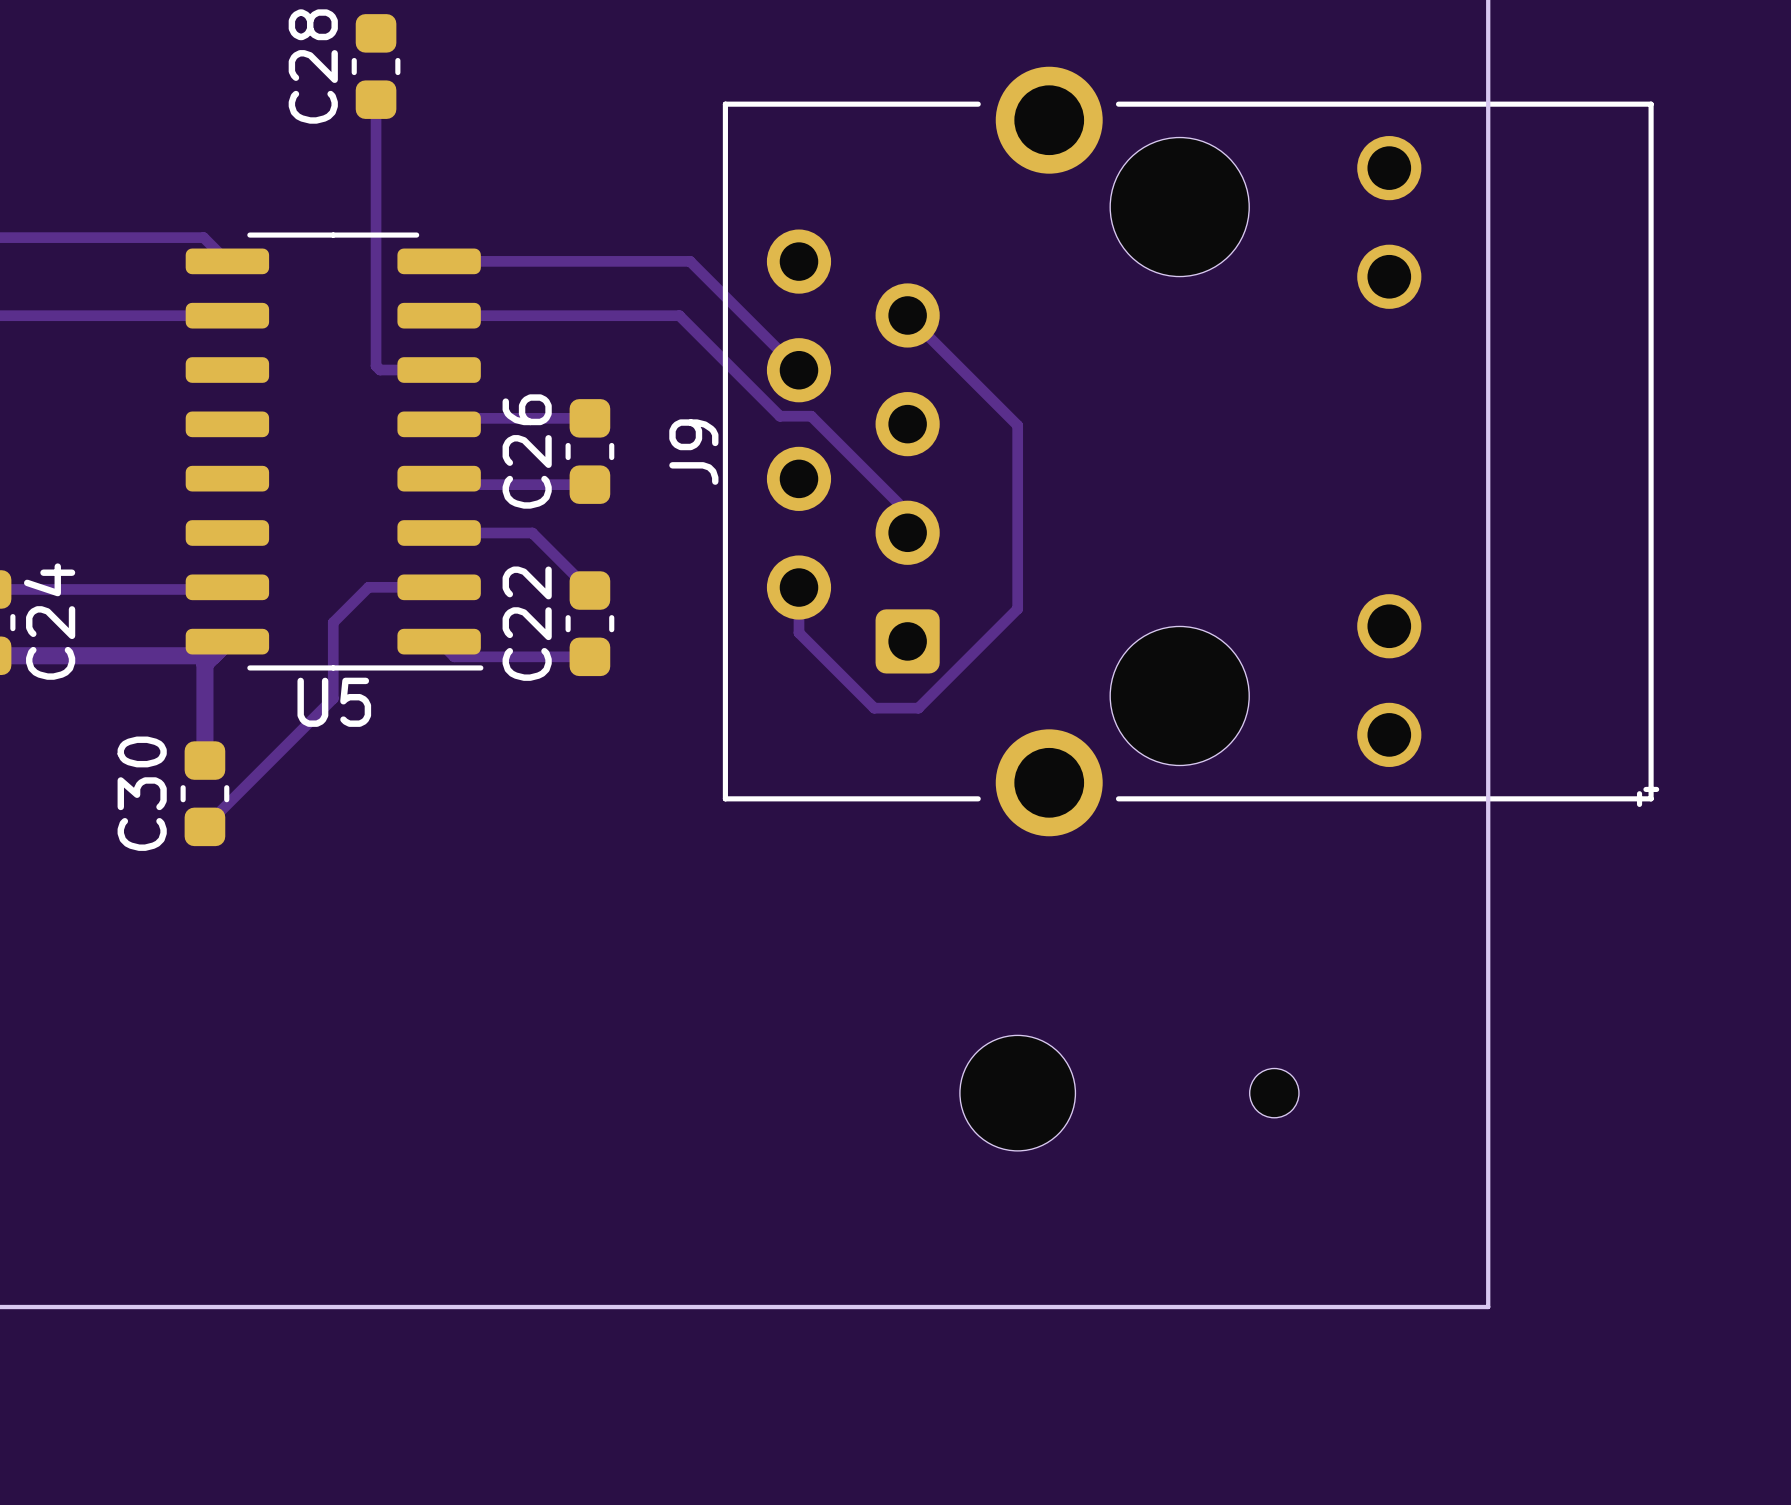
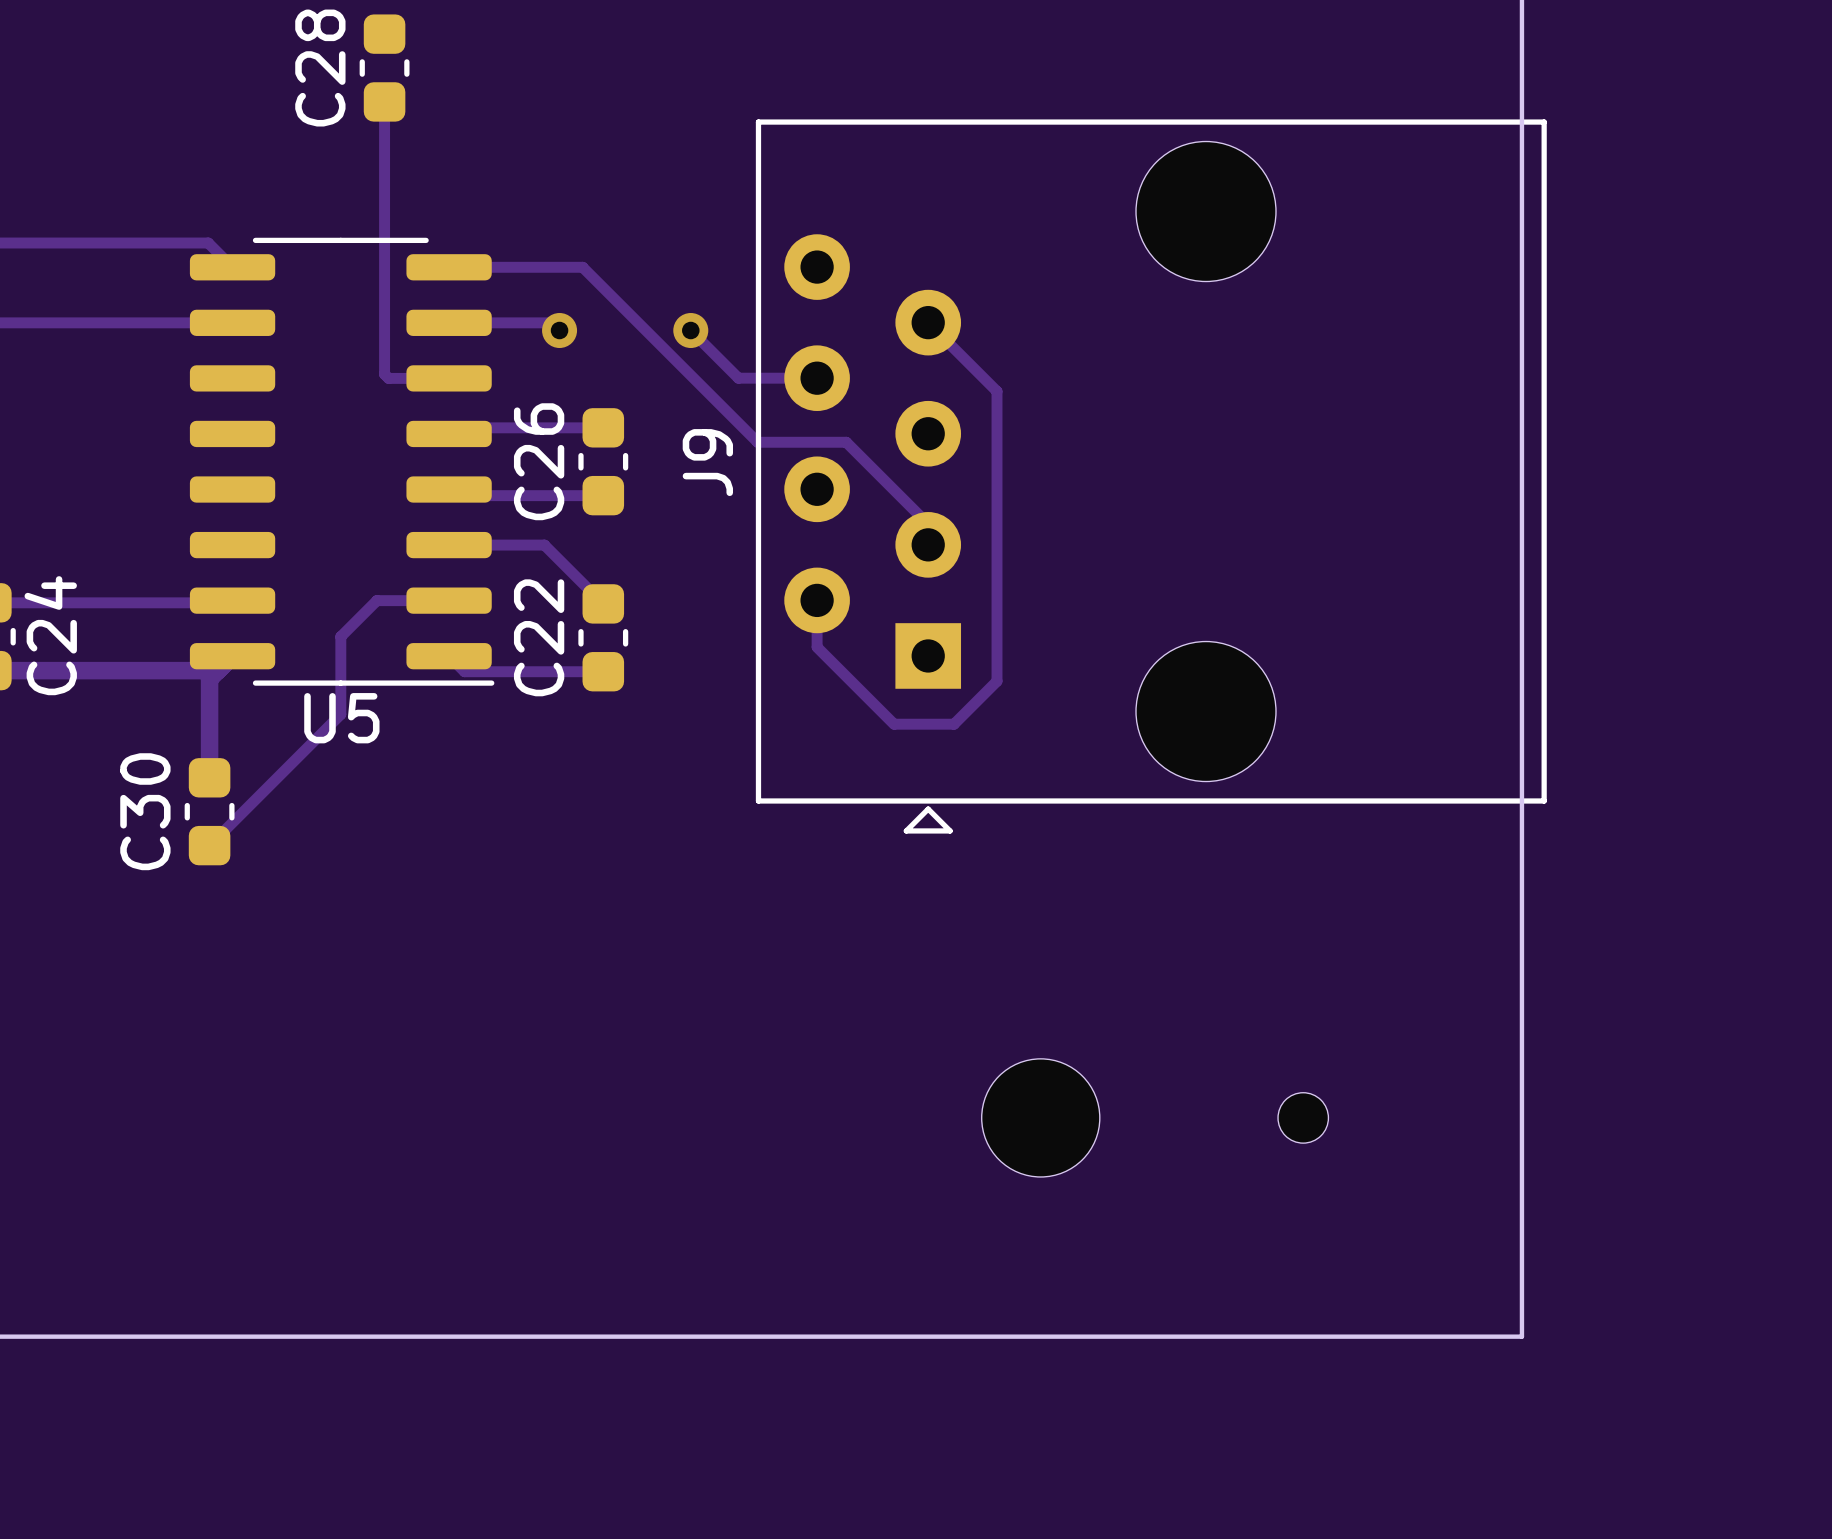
J9 footprint: [722, 66, 1660, 837] -> [755, 119, 1547, 834]
track: (569, 261) (690, 261) (798, 370) -> (690, 330) (738, 378) (817, 378)
track: (539, 315) (679, 315) (779, 416) (811, 416) (827, 432) -> (582, 267) (757, 442) (846, 442)
via: none -> (559, 330)
via: none -> (690, 330)
track: (974, 382) (1017, 425) (1017, 608) (918, 708) -> (997, 391) (997, 681) (954, 724) (939, 724)

